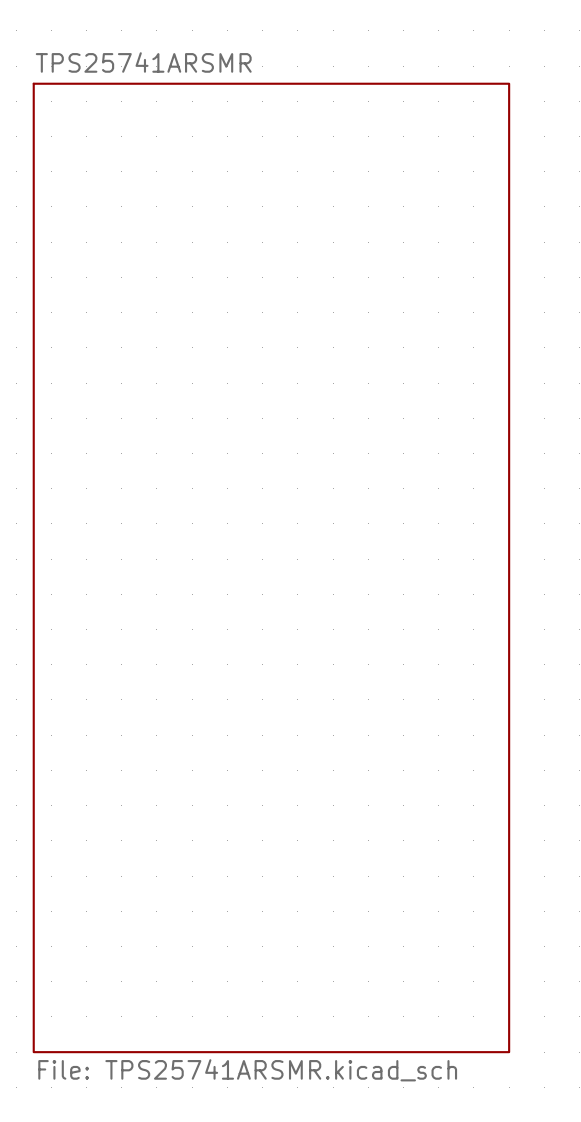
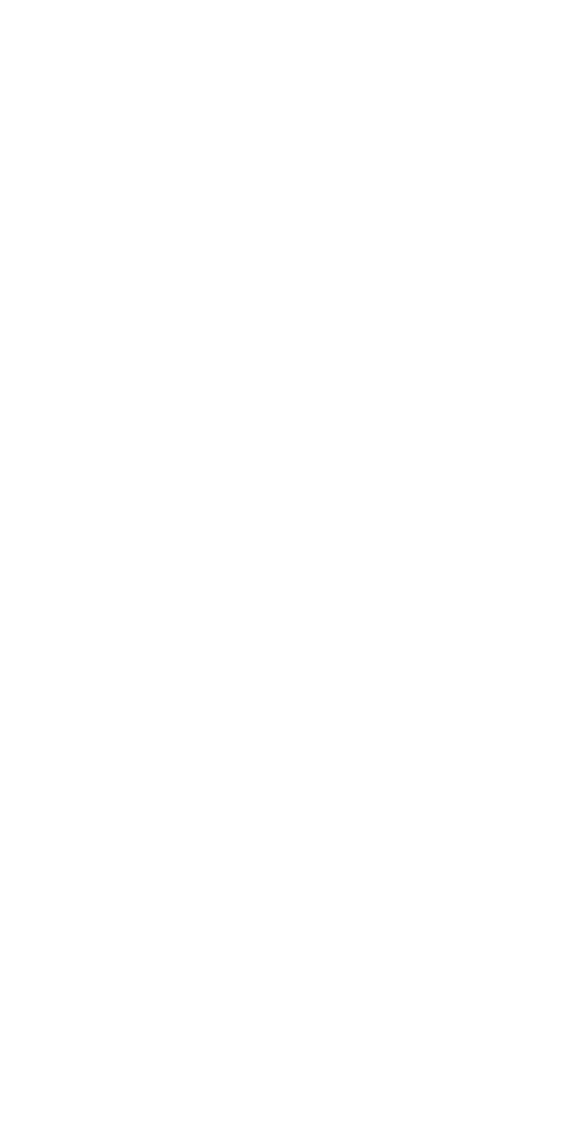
sheet TPS25741ARSMR: File: TPS25741ARSMR.kicad_sch (271, 567) -> none

